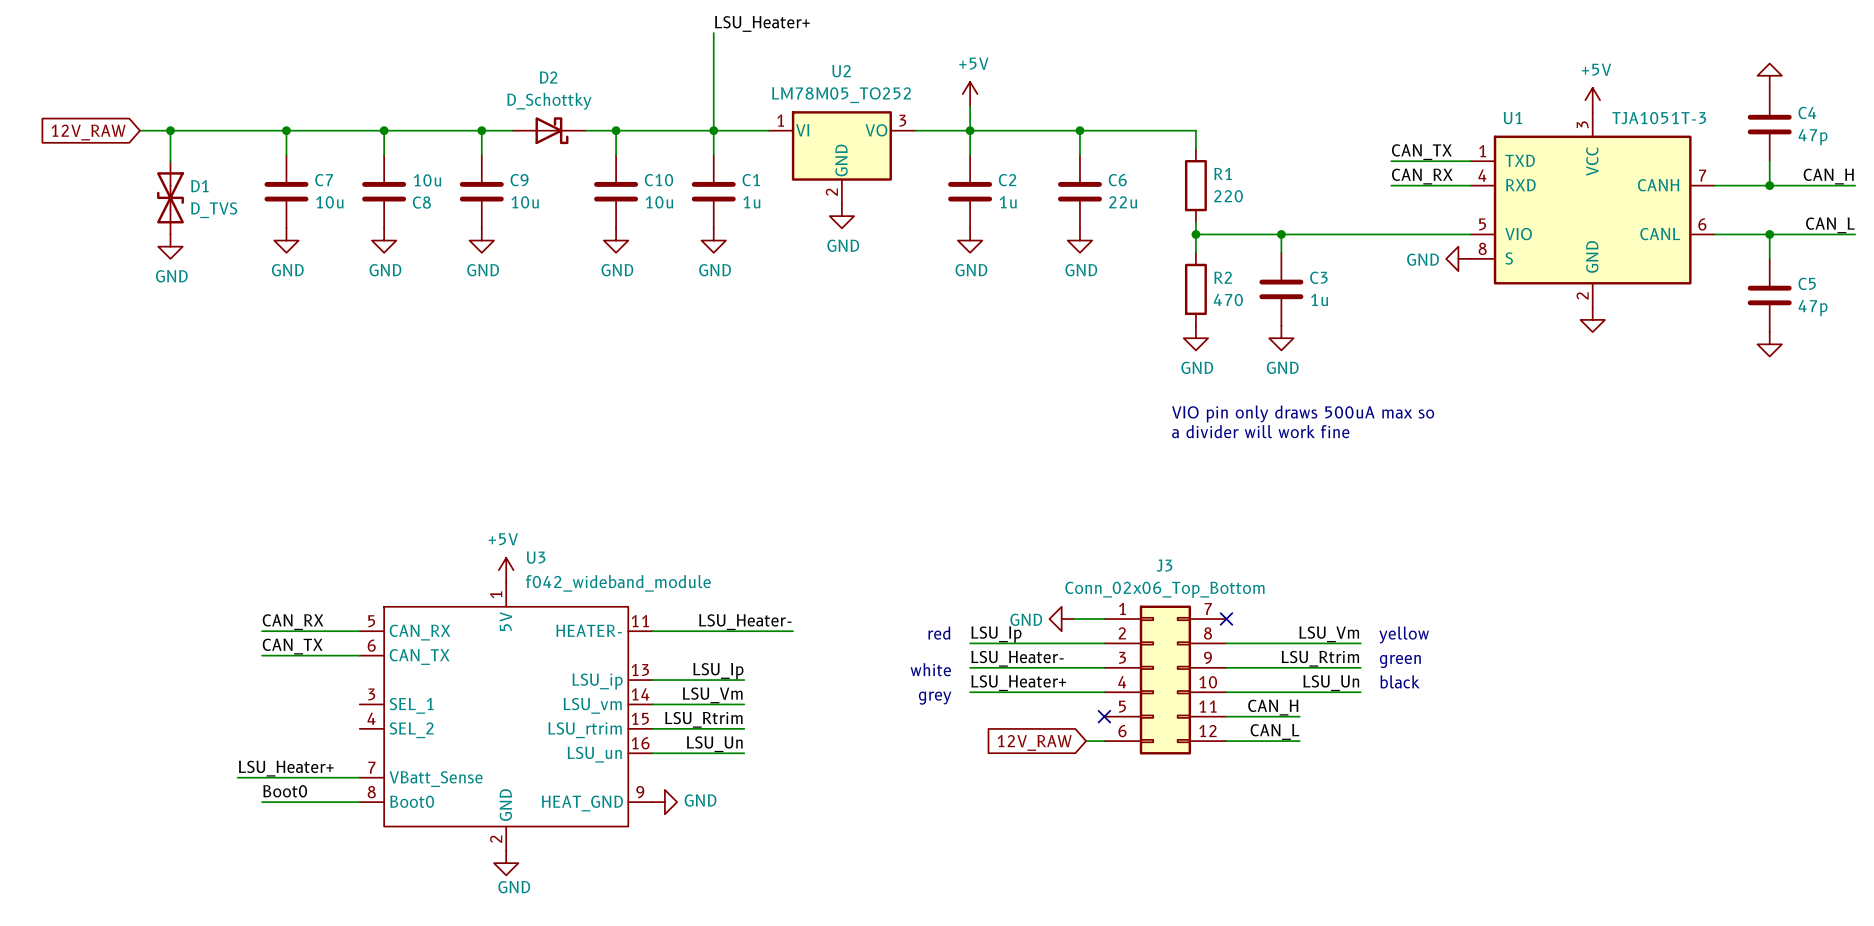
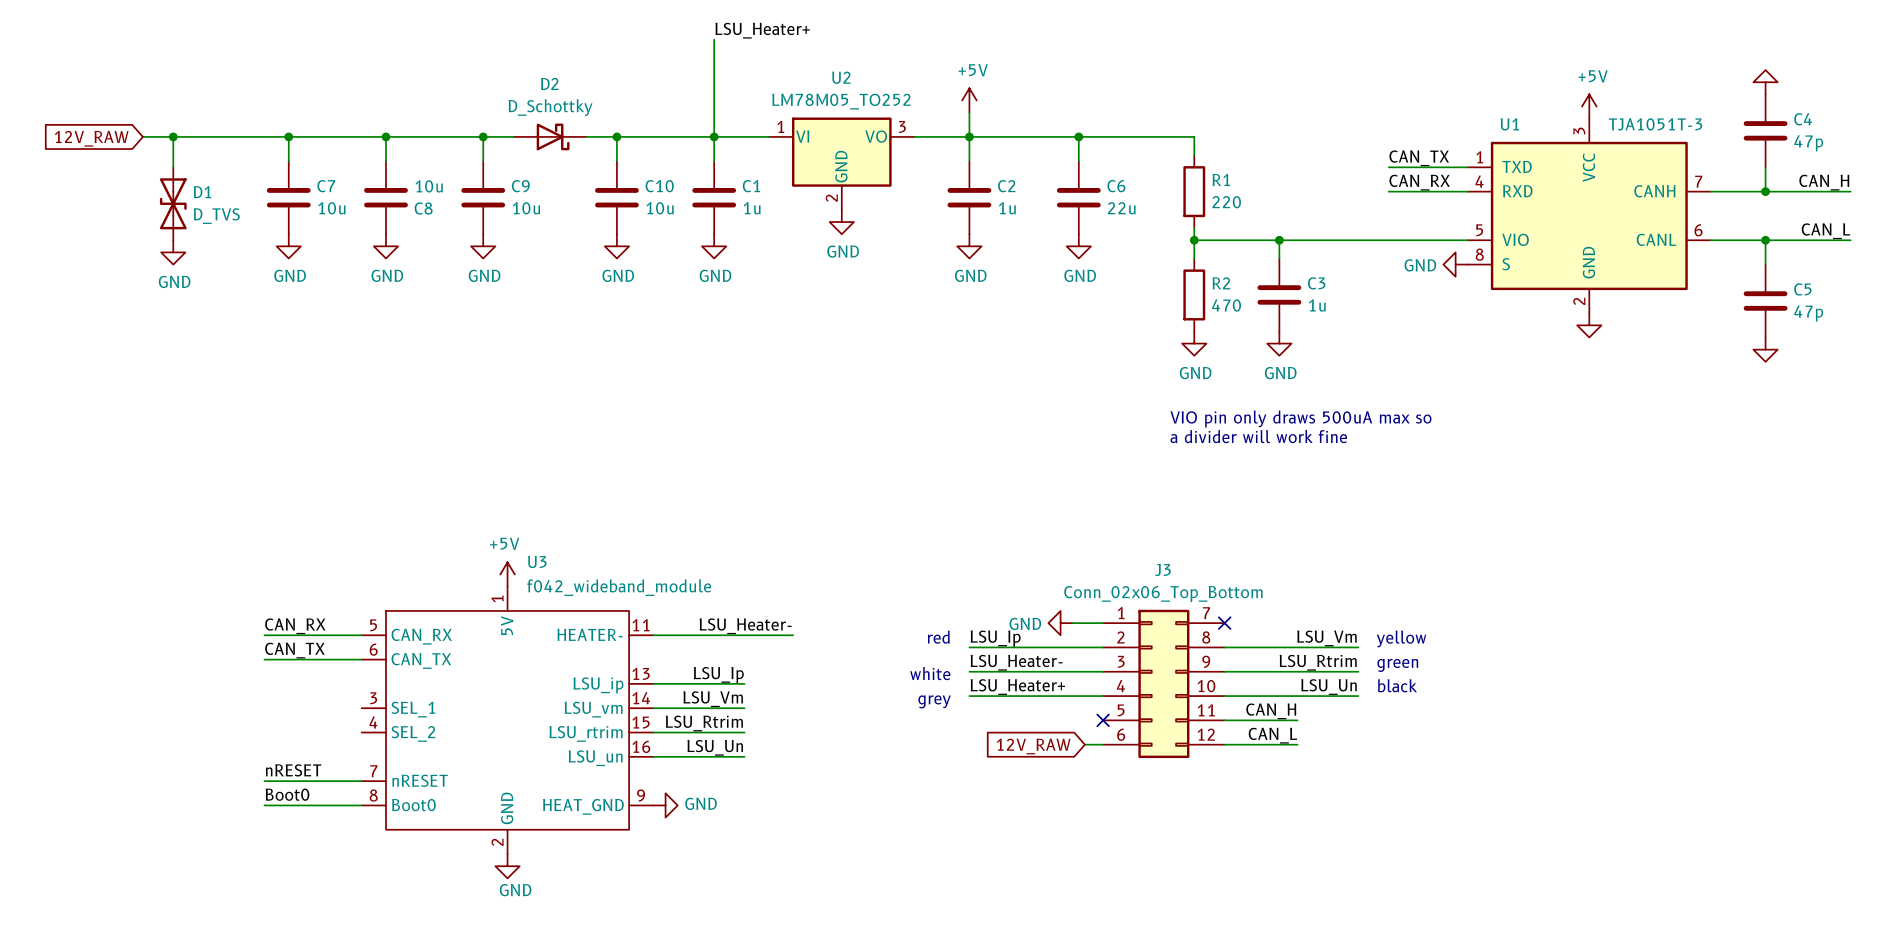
label: none -> nRESET (293, 770)
label: LSU_Heater+ (286, 768) -> none
wire: (237, 777) (262, 777) -> none
U3 pin name: VBatt_Sense (436, 779) -> nRESET (420, 780)

